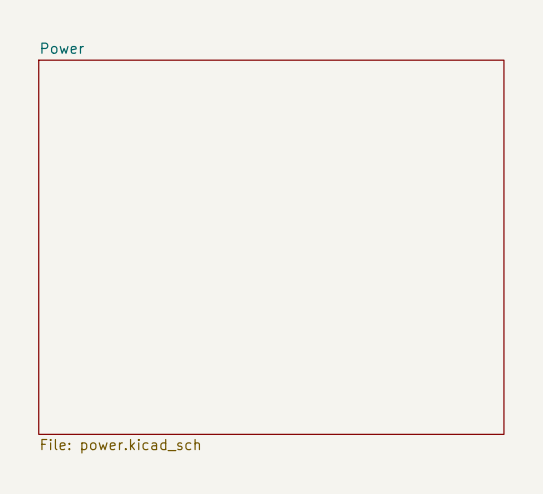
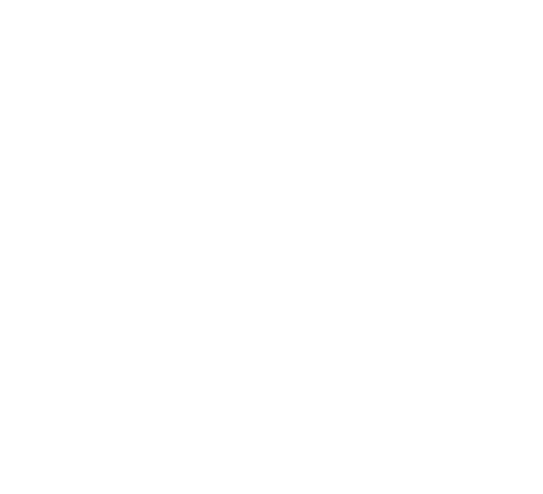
sheet Power: File: power.kicad_sch (271, 247) -> none

